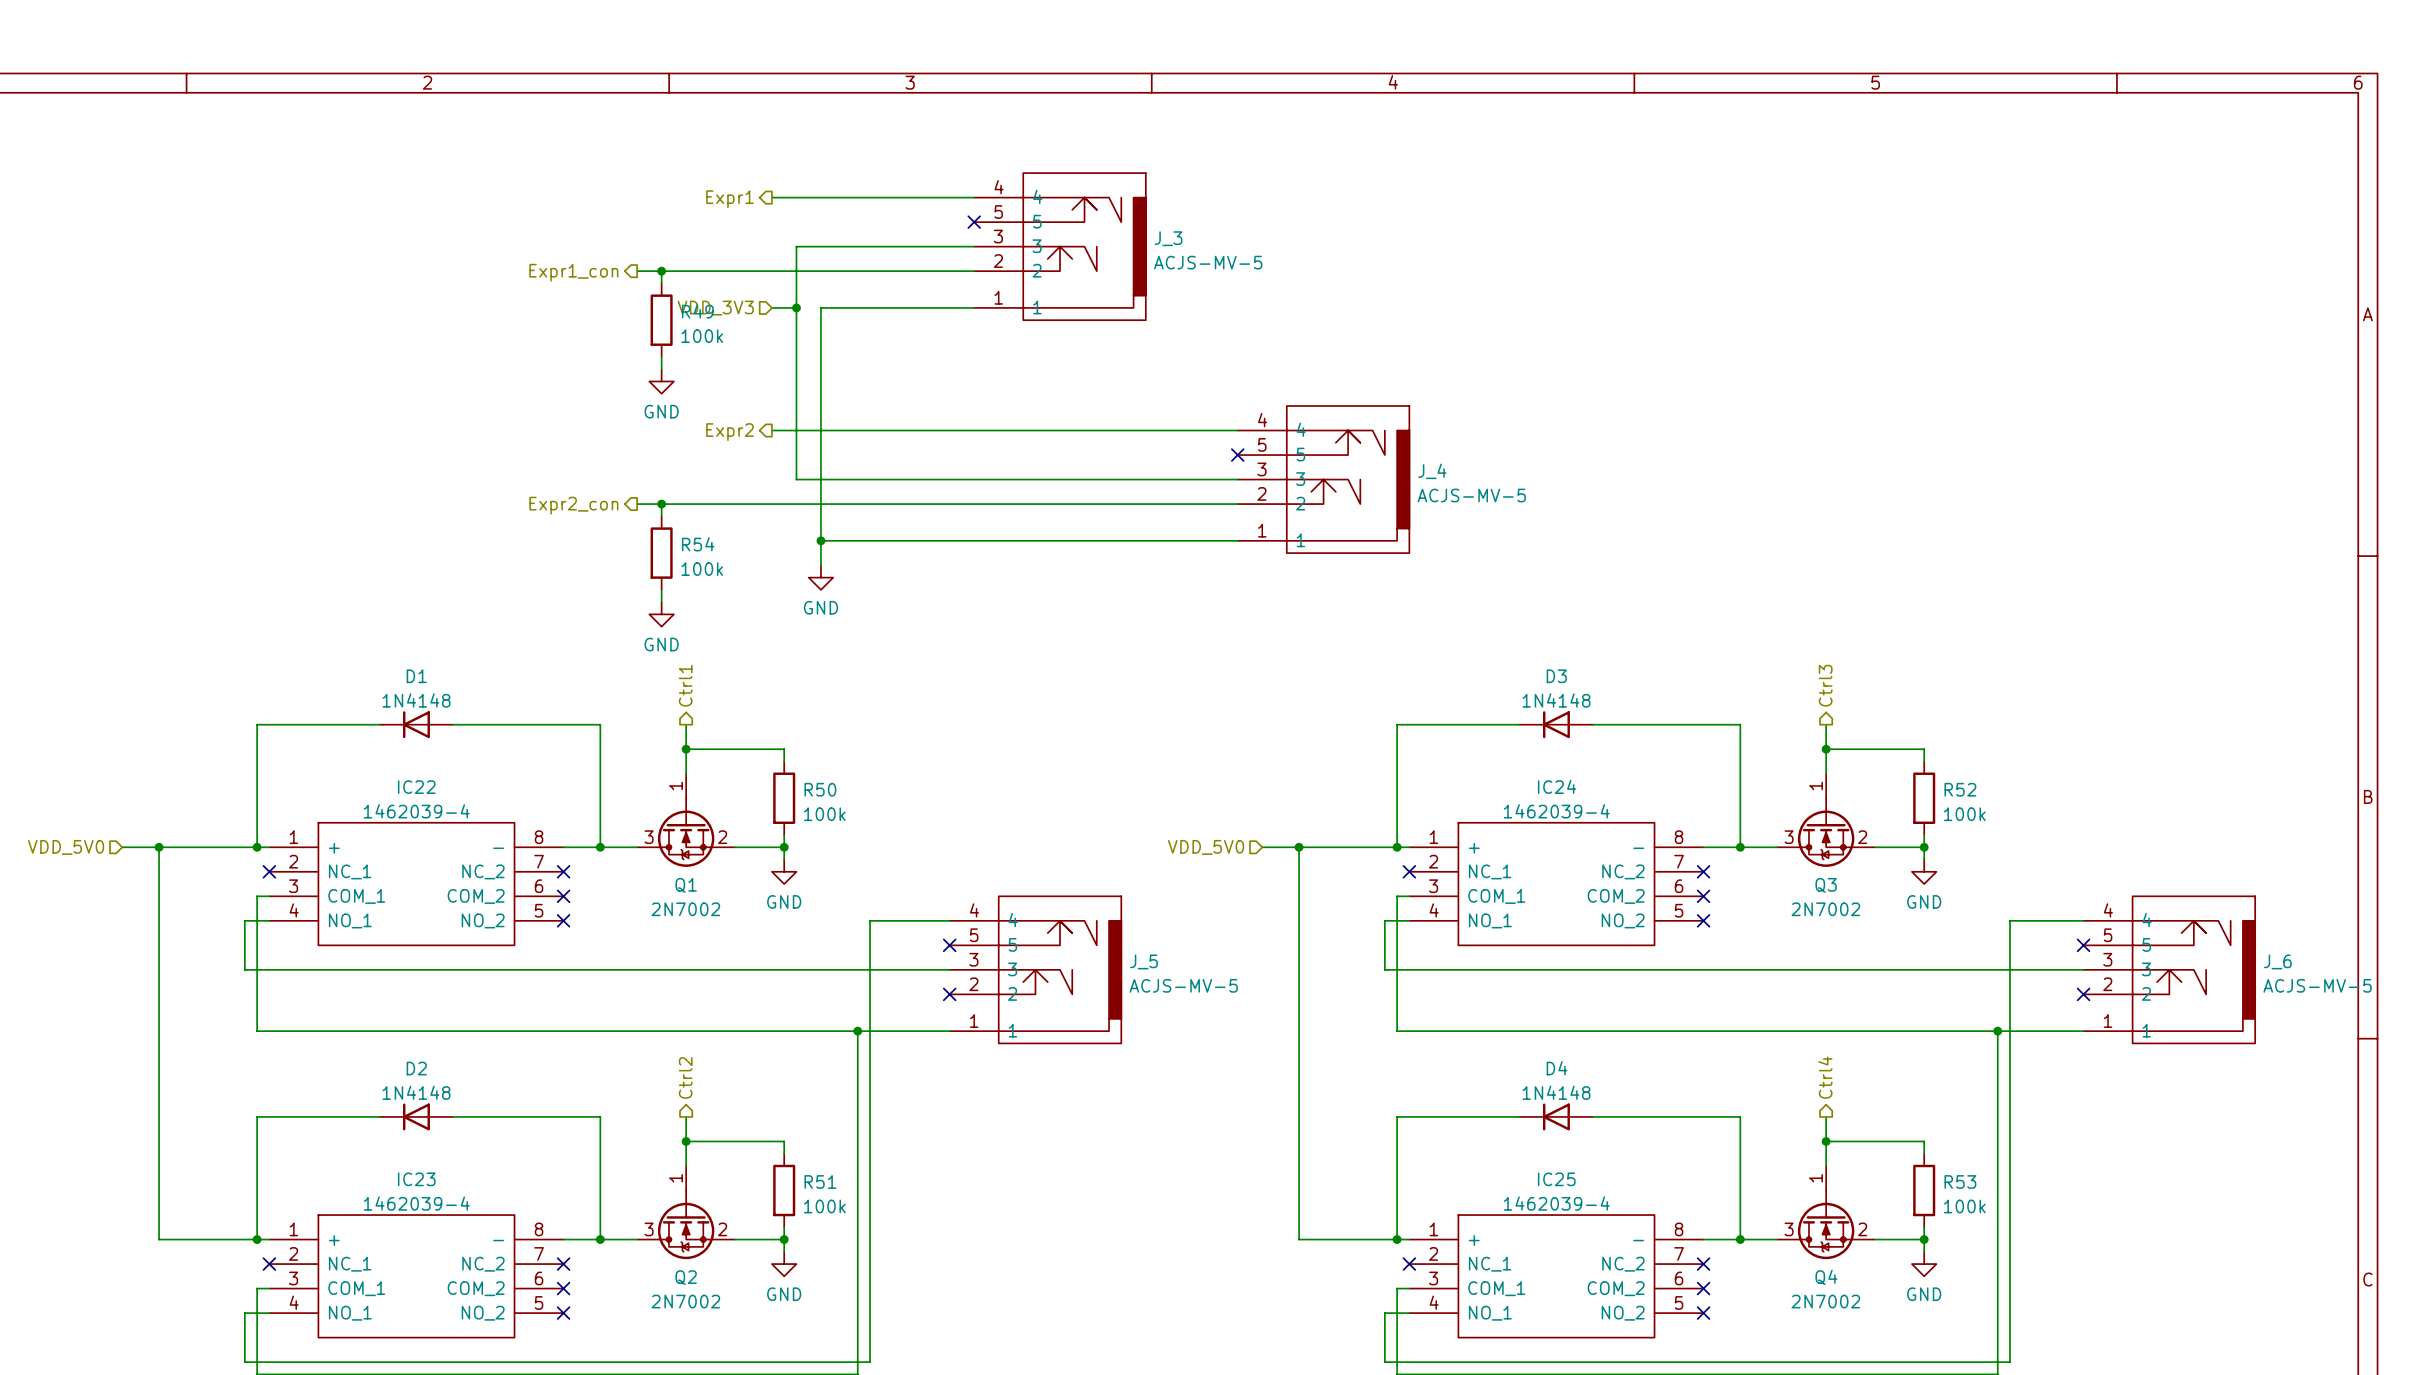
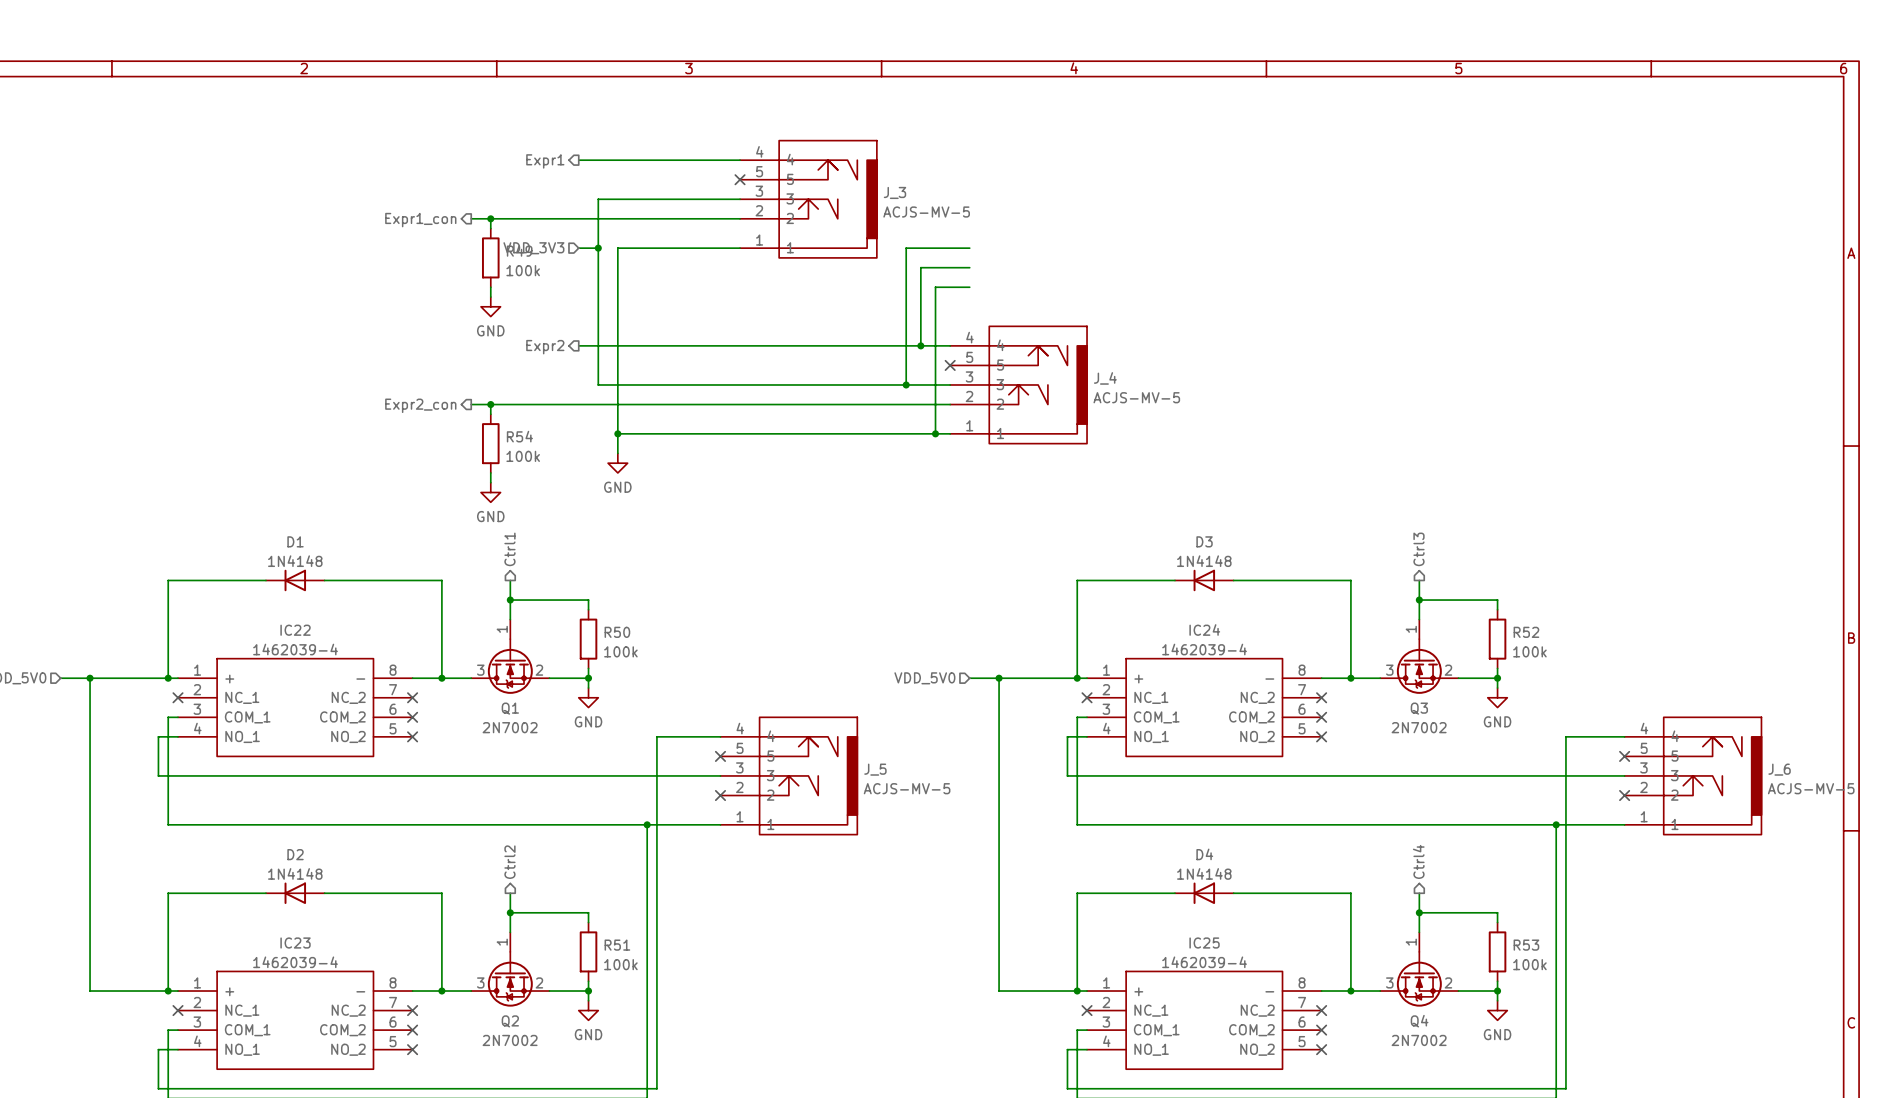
wire: none -> (969, 248) (906, 248) (906, 384)
wire: none -> (969, 267) (920, 267) (920, 345)
wire: none -> (969, 287) (935, 287) (935, 433)
junction: none -> (920, 345)
junction: none -> (906, 384)
junction: none -> (935, 433)

